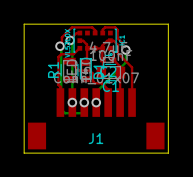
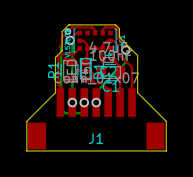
board edge: (24, 24) (168, 24) (168, 153) (24, 153) (24, 24) -> (68, 24) (62, 31) (62, 50) (55, 57) (55, 92) (26, 121) (26, 150) (166, 150) (166, 121) (137, 92) (137, 55) (119, 37) (119, 28) (115, 24) (68, 24)
via: none -> (67, 31)
via: (60, 46) -> none

